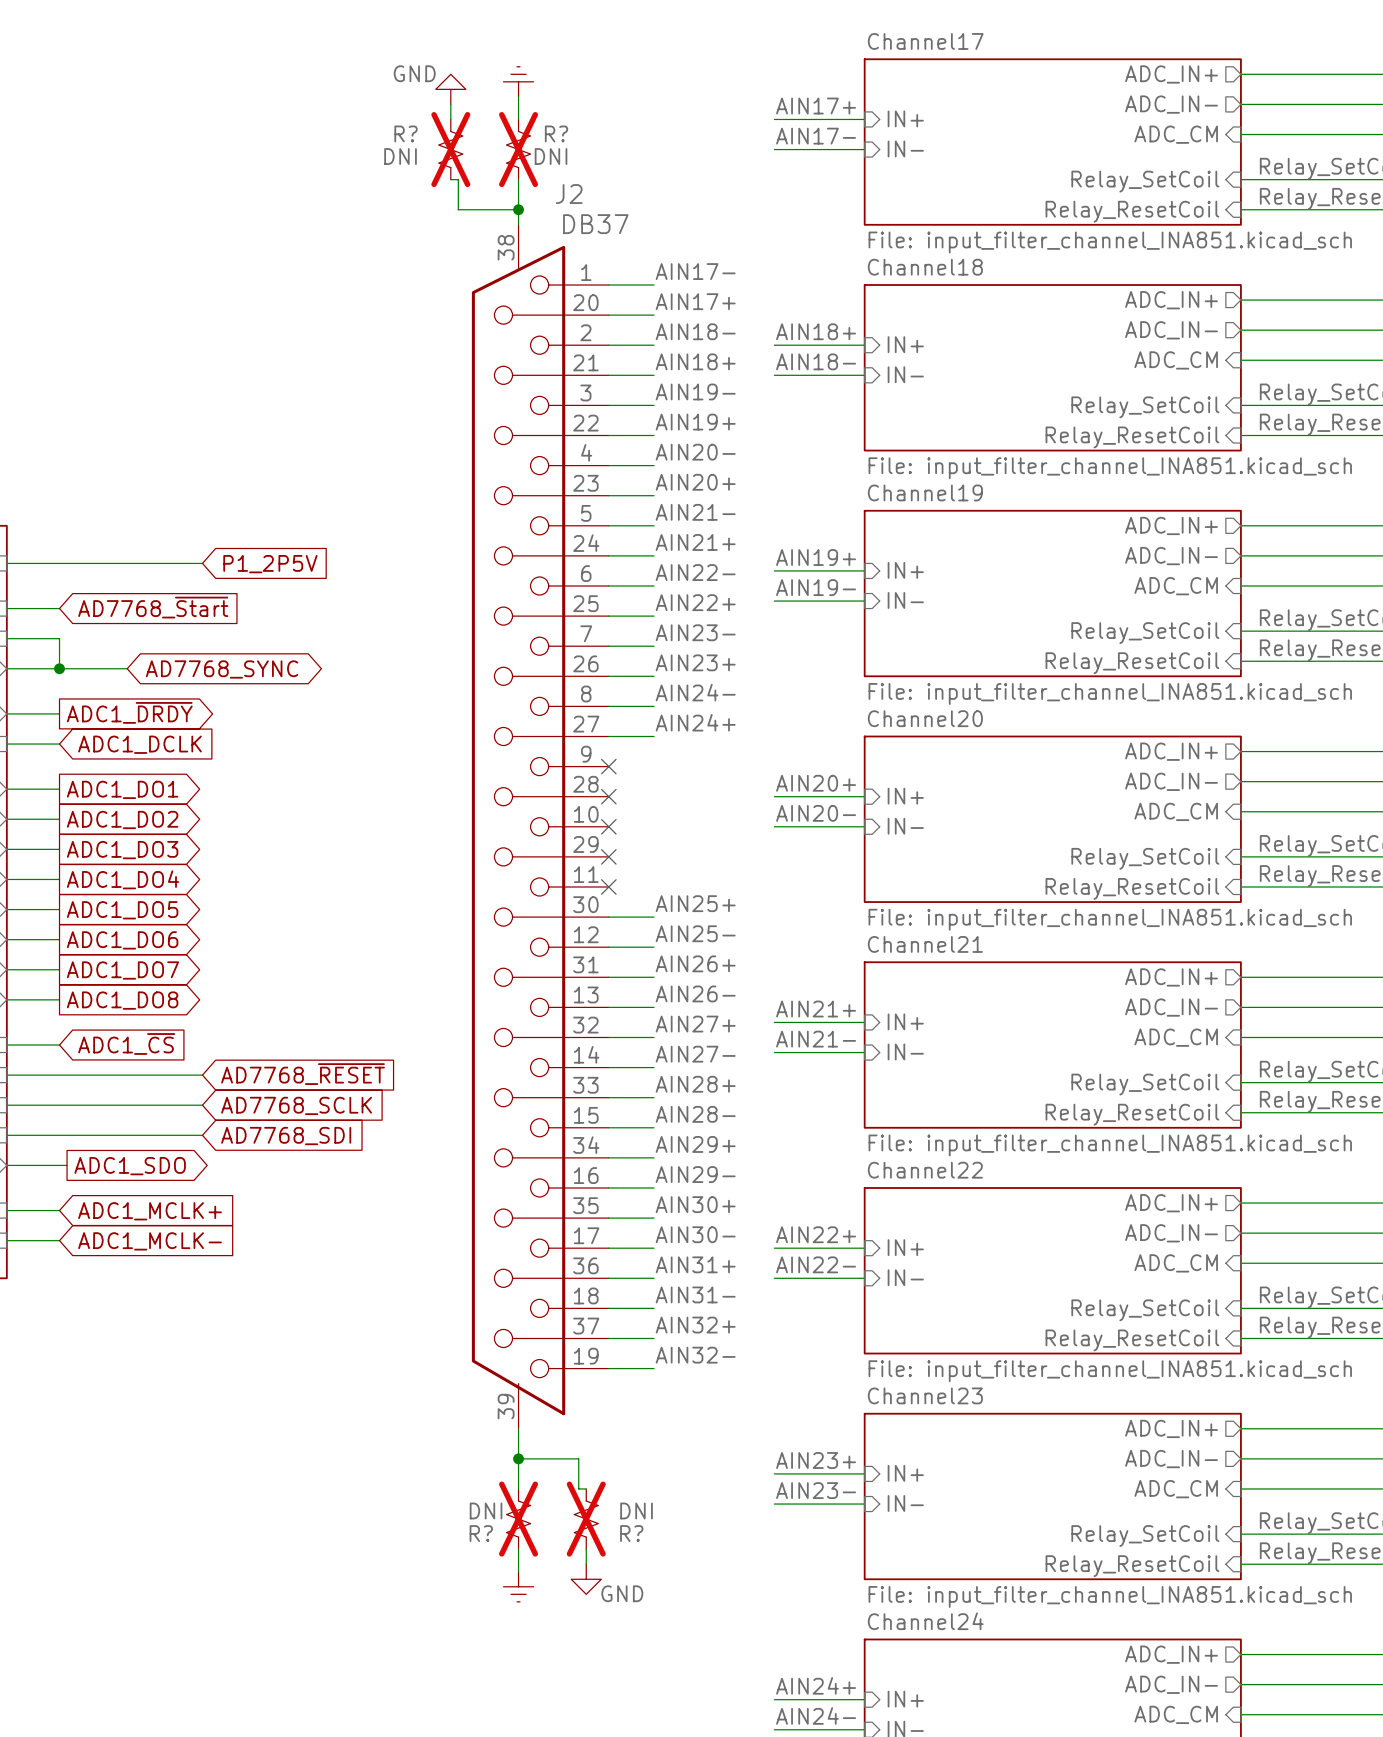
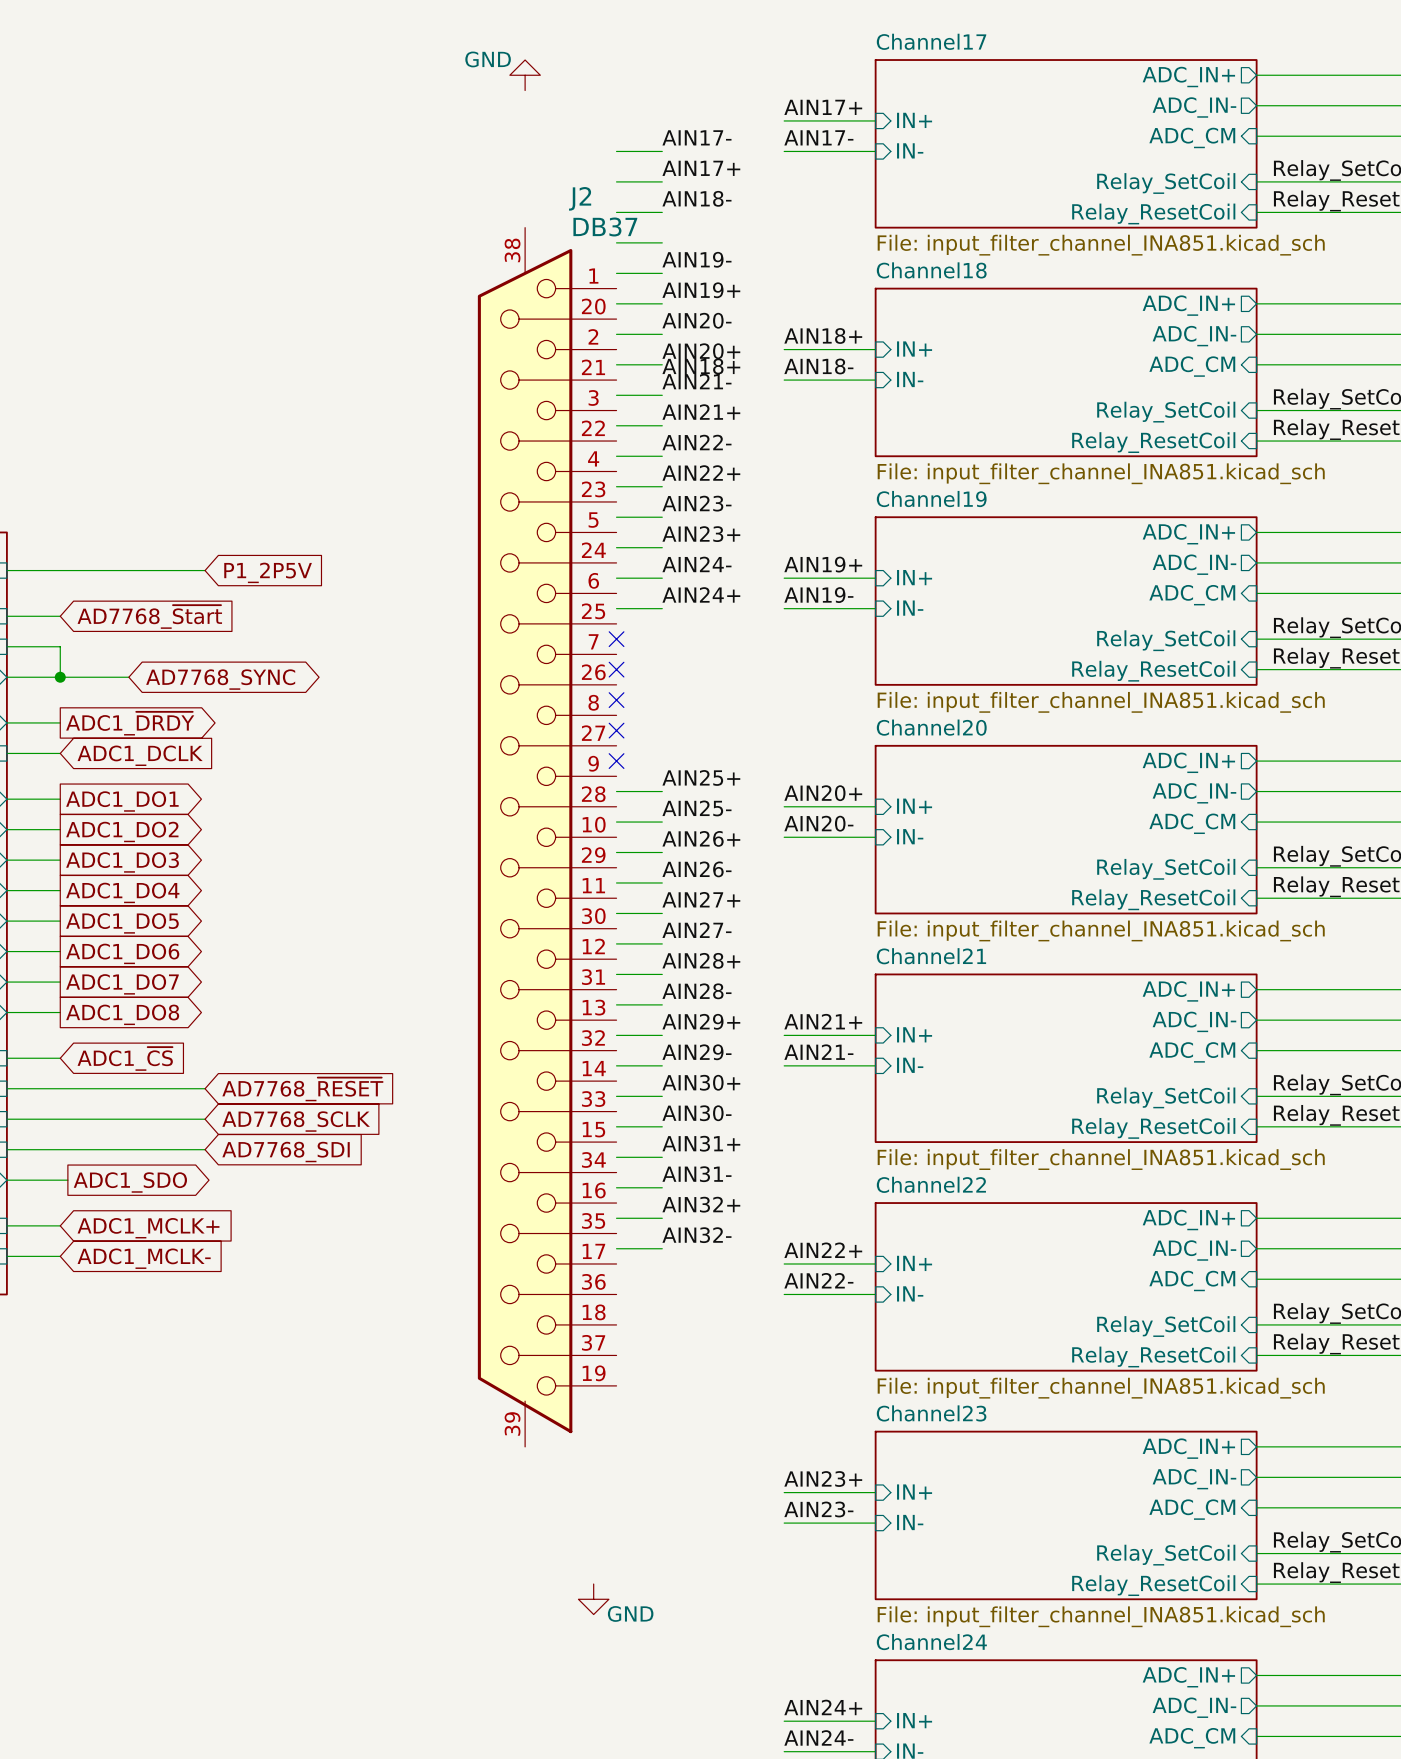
power symbol text: none -> GND (488, 59)
power symbol shape: [503, 66, 534, 97] -> [509, 60, 541, 91]
power symbol: GND (450, 89) -> none
wire: (518, 96) (518, 119) -> none
wire: (450, 104) (450, 119) -> none
R?: DNI (450, 149) -> none
R?: DNI (518, 149) -> none
wire: (450, 179) (458, 179) (458, 209) (518, 209) -> none
wire: (518, 179) (518, 224) -> none
junction: (518, 209) -> none
label position: AIN17- (695, 271) -> AIN17- (696, 137)
wire: (608, 285) (653, 285) -> (616, 151) (662, 151)
label position: AIN17+ (695, 301) -> AIN17+ (701, 168)
wire: (608, 315) (653, 315) -> (616, 181) (662, 181)
label position: AIN18- (695, 331) -> AIN18- (696, 198)
wire: (608, 345) (653, 345) -> (616, 212) (662, 212)
wire: (608, 375) (653, 375) -> (616, 242) (662, 242)
label position: AIN19- (695, 391) -> AIN19- (696, 259)
wire: (608, 405) (653, 405) -> (616, 273) (662, 273)
label position: AIN19+ (695, 422) -> AIN19+ (701, 290)
wire: (608, 435) (653, 435) -> (616, 303) (662, 303)
label position: AIN20- (695, 452) -> AIN20- (696, 320)
wire: (608, 465) (653, 465) -> (616, 334) (662, 334)
label position: AIN20+ (695, 482) -> AIN20+ (701, 351)
wire: (608, 495) (653, 495) -> (616, 364) (662, 364)
label position: AIN21- (695, 512) -> AIN21- (696, 381)
wire: (608, 525) (653, 525) -> (616, 395) (662, 395)
label position: AIN21+ (695, 542) -> AIN21+ (701, 412)
wire: (608, 555) (653, 555) -> (616, 425) (662, 425)
label position: AIN22- (695, 572) -> AIN22- (696, 442)
wire: (608, 586) (653, 586) -> (616, 456) (662, 456)
label position: AIN22+ (695, 602) -> AIN22+ (701, 473)
wire: (608, 616) (653, 616) -> (616, 486) (662, 486)
no-connect mark: none -> (616, 639)
label position: AIN23- (695, 632) -> AIN23- (696, 503)
wire: (608, 646) (653, 646) -> (616, 517) (662, 517)
no-connect mark: none -> (616, 669)
label position: AIN23+ (695, 662) -> AIN23+ (701, 534)
wire: (608, 676) (653, 676) -> (616, 547) (662, 547)
no-connect mark: none -> (616, 700)
label position: AIN24- (695, 692) -> AIN24- (696, 564)
wire: (608, 706) (653, 706) -> (616, 578) (662, 578)
no-connect mark: none -> (616, 730)
label position: AIN24+ (695, 722) -> AIN24+ (701, 594)
wire: (608, 736) (653, 736) -> (616, 608) (662, 608)
no-connect mark position: (608, 766) -> (616, 761)
no-connect mark: (608, 796) -> none
no-connect mark: (608, 826) -> none
no-connect mark: (608, 856) -> none
no-connect mark: (608, 886) -> none
label position: AIN25+ (695, 903) -> AIN25+ (701, 777)
wire: (608, 917) (653, 917) -> (616, 791) (662, 791)
label position: AIN25- (695, 933) -> AIN25- (696, 808)
wire: (608, 947) (653, 947) -> (616, 822) (662, 822)
label position: AIN26+ (695, 963) -> AIN26+ (701, 838)
wire: (608, 977) (653, 977) -> (616, 852) (662, 852)
label position: AIN26- (695, 993) -> AIN26- (696, 869)
wire: (608, 1007) (653, 1007) -> (616, 882) (662, 882)
label position: AIN27+ (695, 1024) -> AIN27+ (701, 899)
wire: (608, 1037) (653, 1037) -> (616, 913) (662, 913)
label position: AIN27- (695, 1054) -> AIN27- (696, 930)
wire: (608, 1067) (653, 1067) -> (616, 943) (662, 943)
label position: AIN28+ (695, 1084) -> AIN28+ (701, 960)
wire: (608, 1097) (653, 1097) -> (616, 974) (662, 974)
label position: AIN28- (695, 1114) -> AIN28- (696, 991)
wire: (608, 1127) (653, 1127) -> (616, 1004) (662, 1004)
label position: AIN29+ (695, 1144) -> AIN29+ (701, 1021)
wire: (608, 1157) (653, 1157) -> (616, 1035) (662, 1035)
label position: AIN29- (695, 1174) -> AIN29- (696, 1052)
wire: (608, 1187) (653, 1187) -> (616, 1065) (662, 1065)
label position: AIN30+ (695, 1204) -> AIN30+ (701, 1082)
wire: (608, 1218) (653, 1218) -> (616, 1096) (662, 1096)
label position: AIN30- (695, 1234) -> AIN30- (696, 1113)
wire: (608, 1248) (653, 1248) -> (616, 1126) (662, 1126)
label position: AIN31+ (695, 1264) -> AIN31+ (701, 1143)
wire: (608, 1278) (653, 1278) -> (616, 1157) (662, 1157)
label position: AIN31- (695, 1294) -> AIN31- (696, 1174)
wire: (608, 1308) (653, 1308) -> (616, 1187) (662, 1187)
label position: AIN32+ (695, 1325) -> AIN32+ (701, 1204)
wire: (608, 1338) (653, 1338) -> (616, 1218) (662, 1218)
label position: AIN32- (695, 1355) -> AIN32- (696, 1235)
wire: (608, 1368) (653, 1368) -> (616, 1248) (662, 1248)
wire: (518, 1428) (518, 1488) -> none
wire: (518, 1458) (578, 1458) (578, 1488) (586, 1488) -> none
junction: (518, 1458) -> none
R?: DNI (518, 1519) -> none
R?: DNI (586, 1519) -> none
wire: (518, 1549) (518, 1571) -> none
wire: (586, 1549) (586, 1564) -> none
power symbol: (518, 1586) -> none

